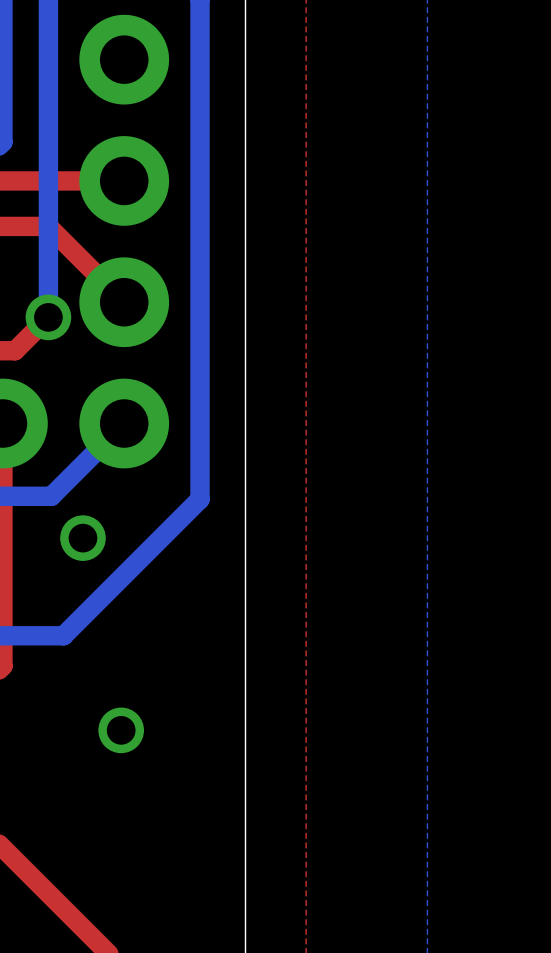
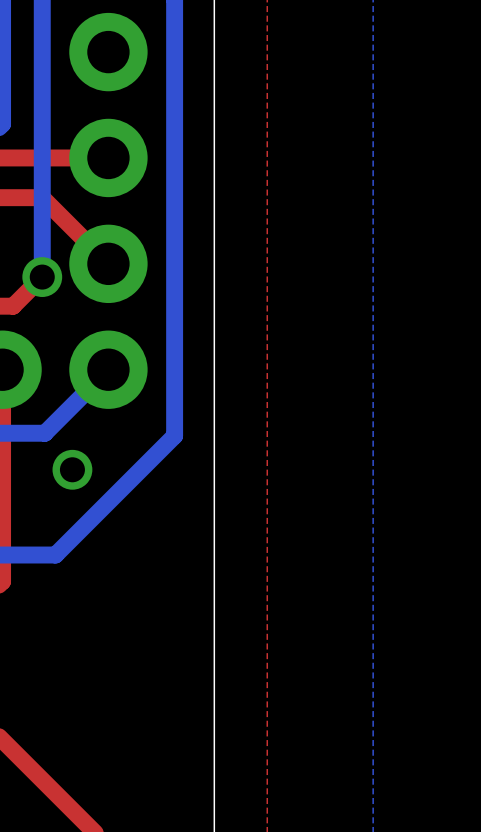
via: (121, 730) -> none

